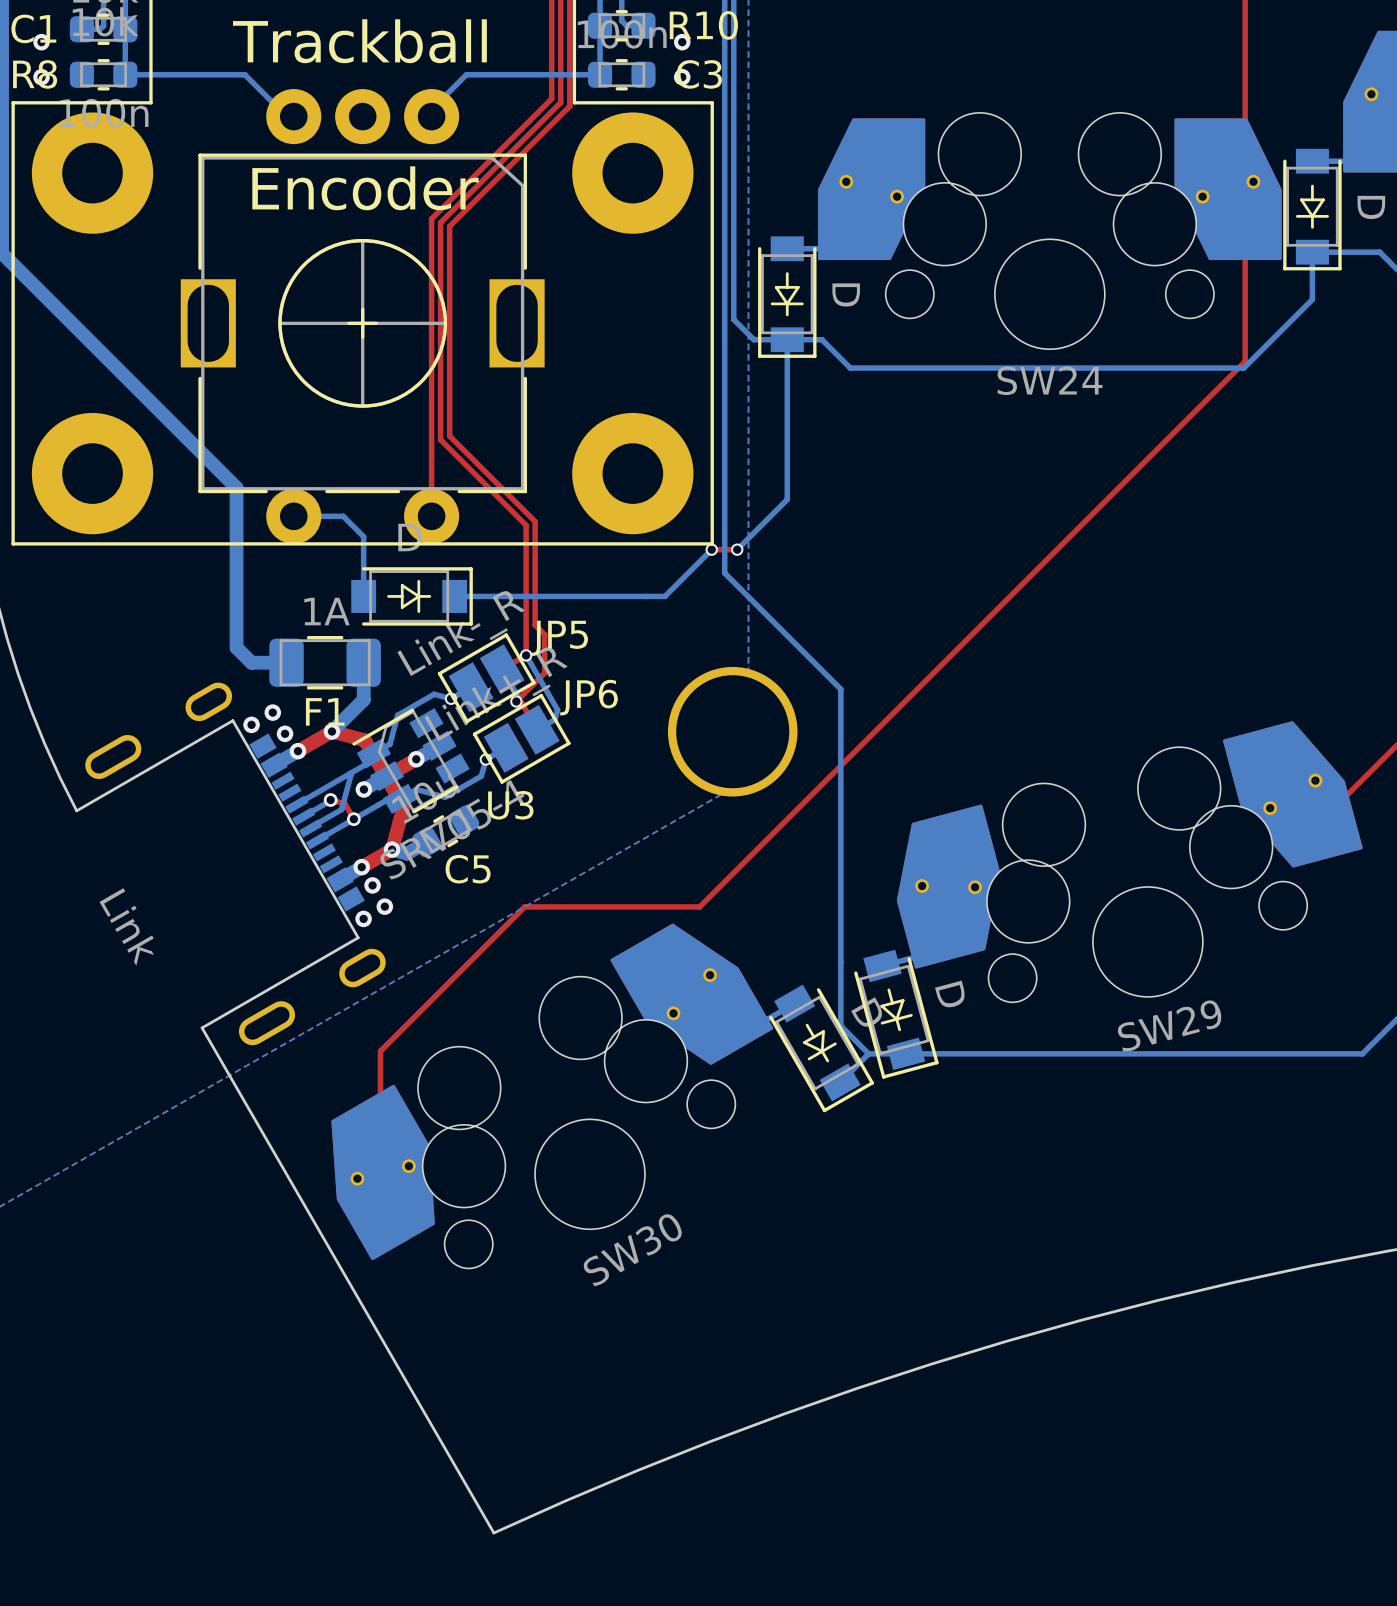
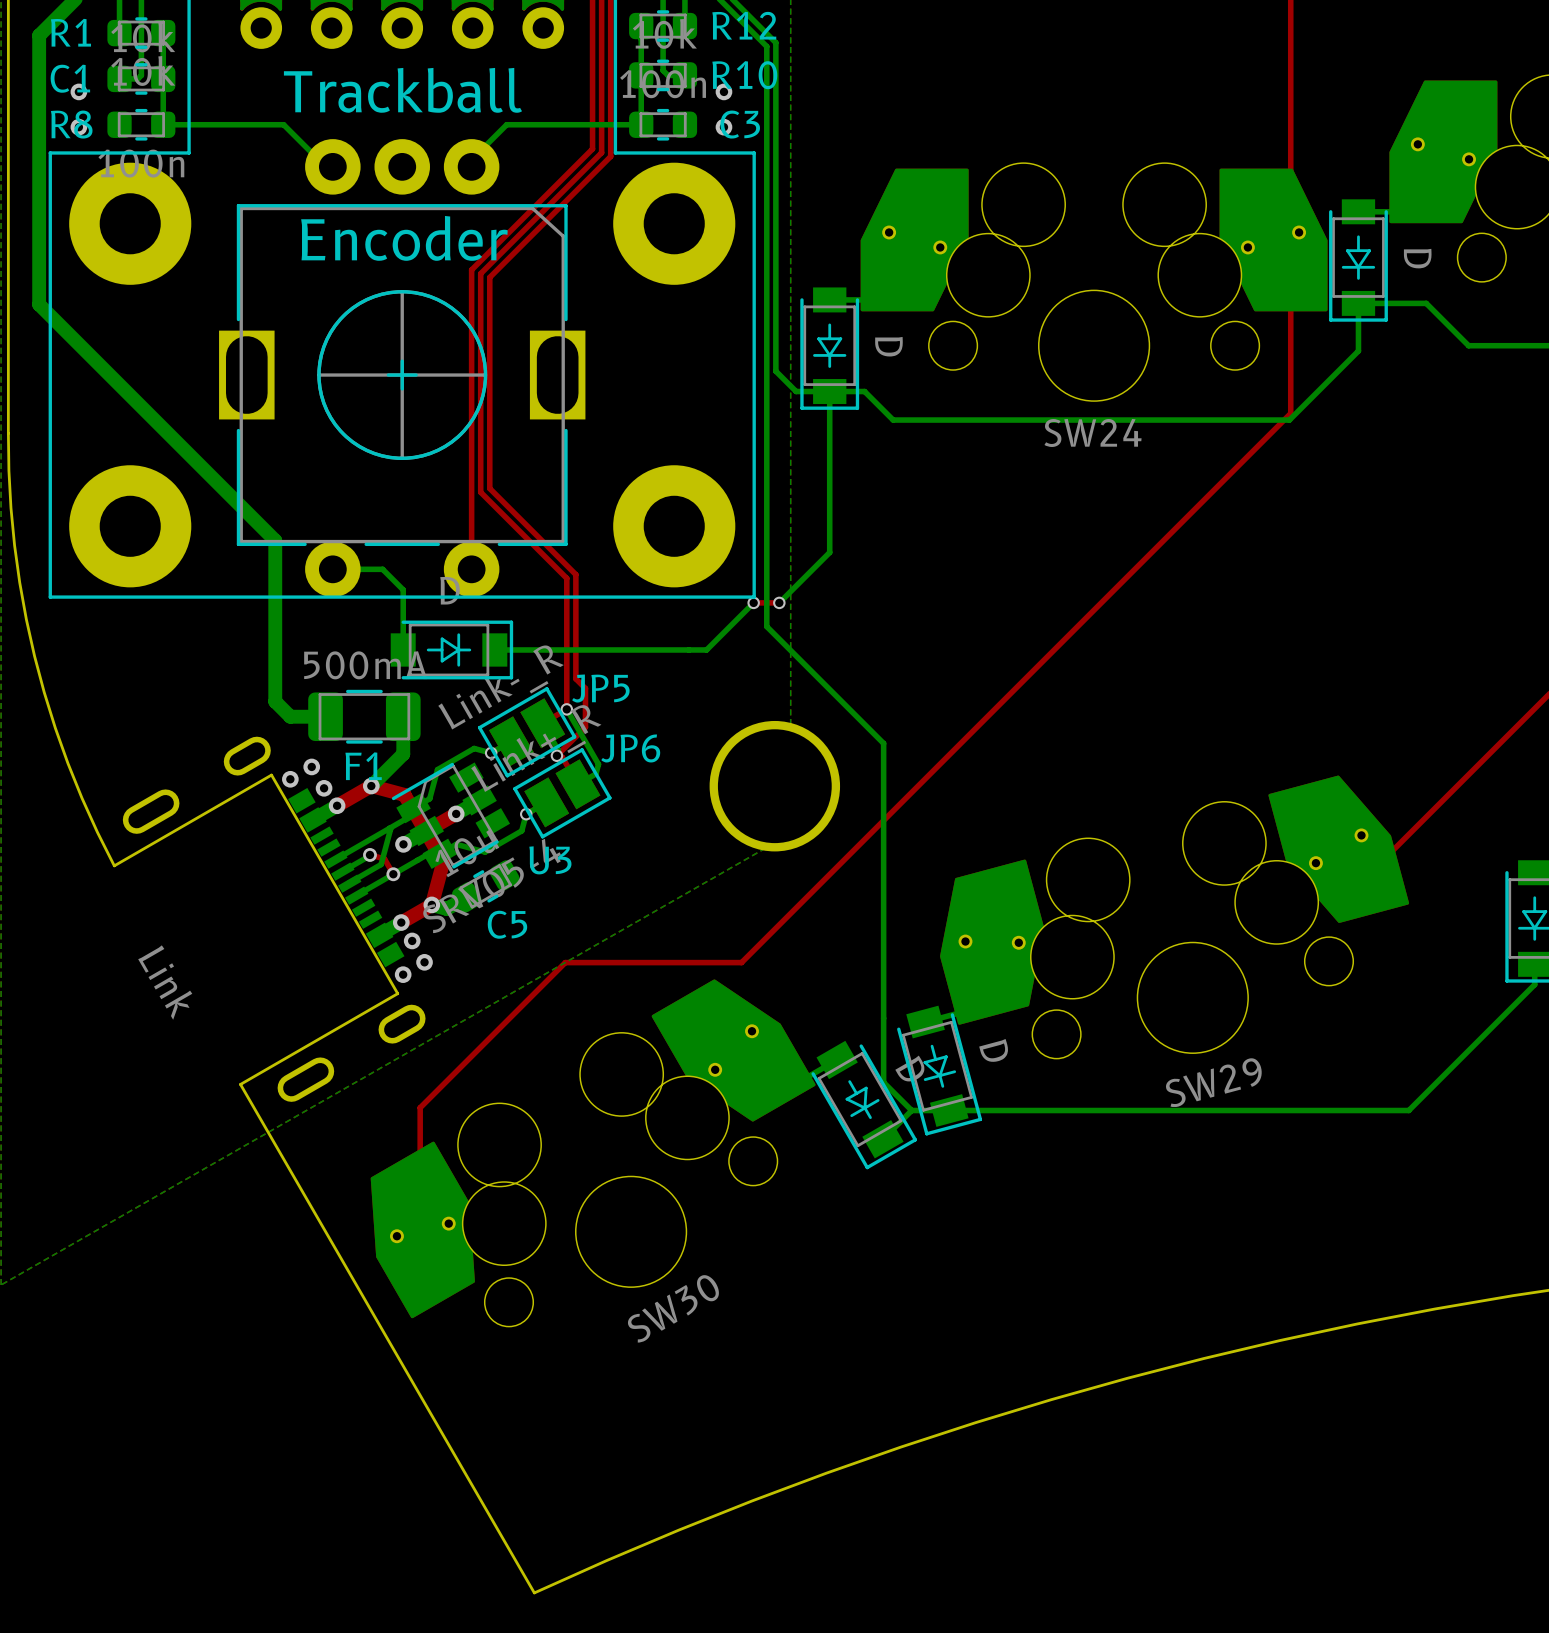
F1 value: 1A (327, 611) -> 500mA (365, 665)

